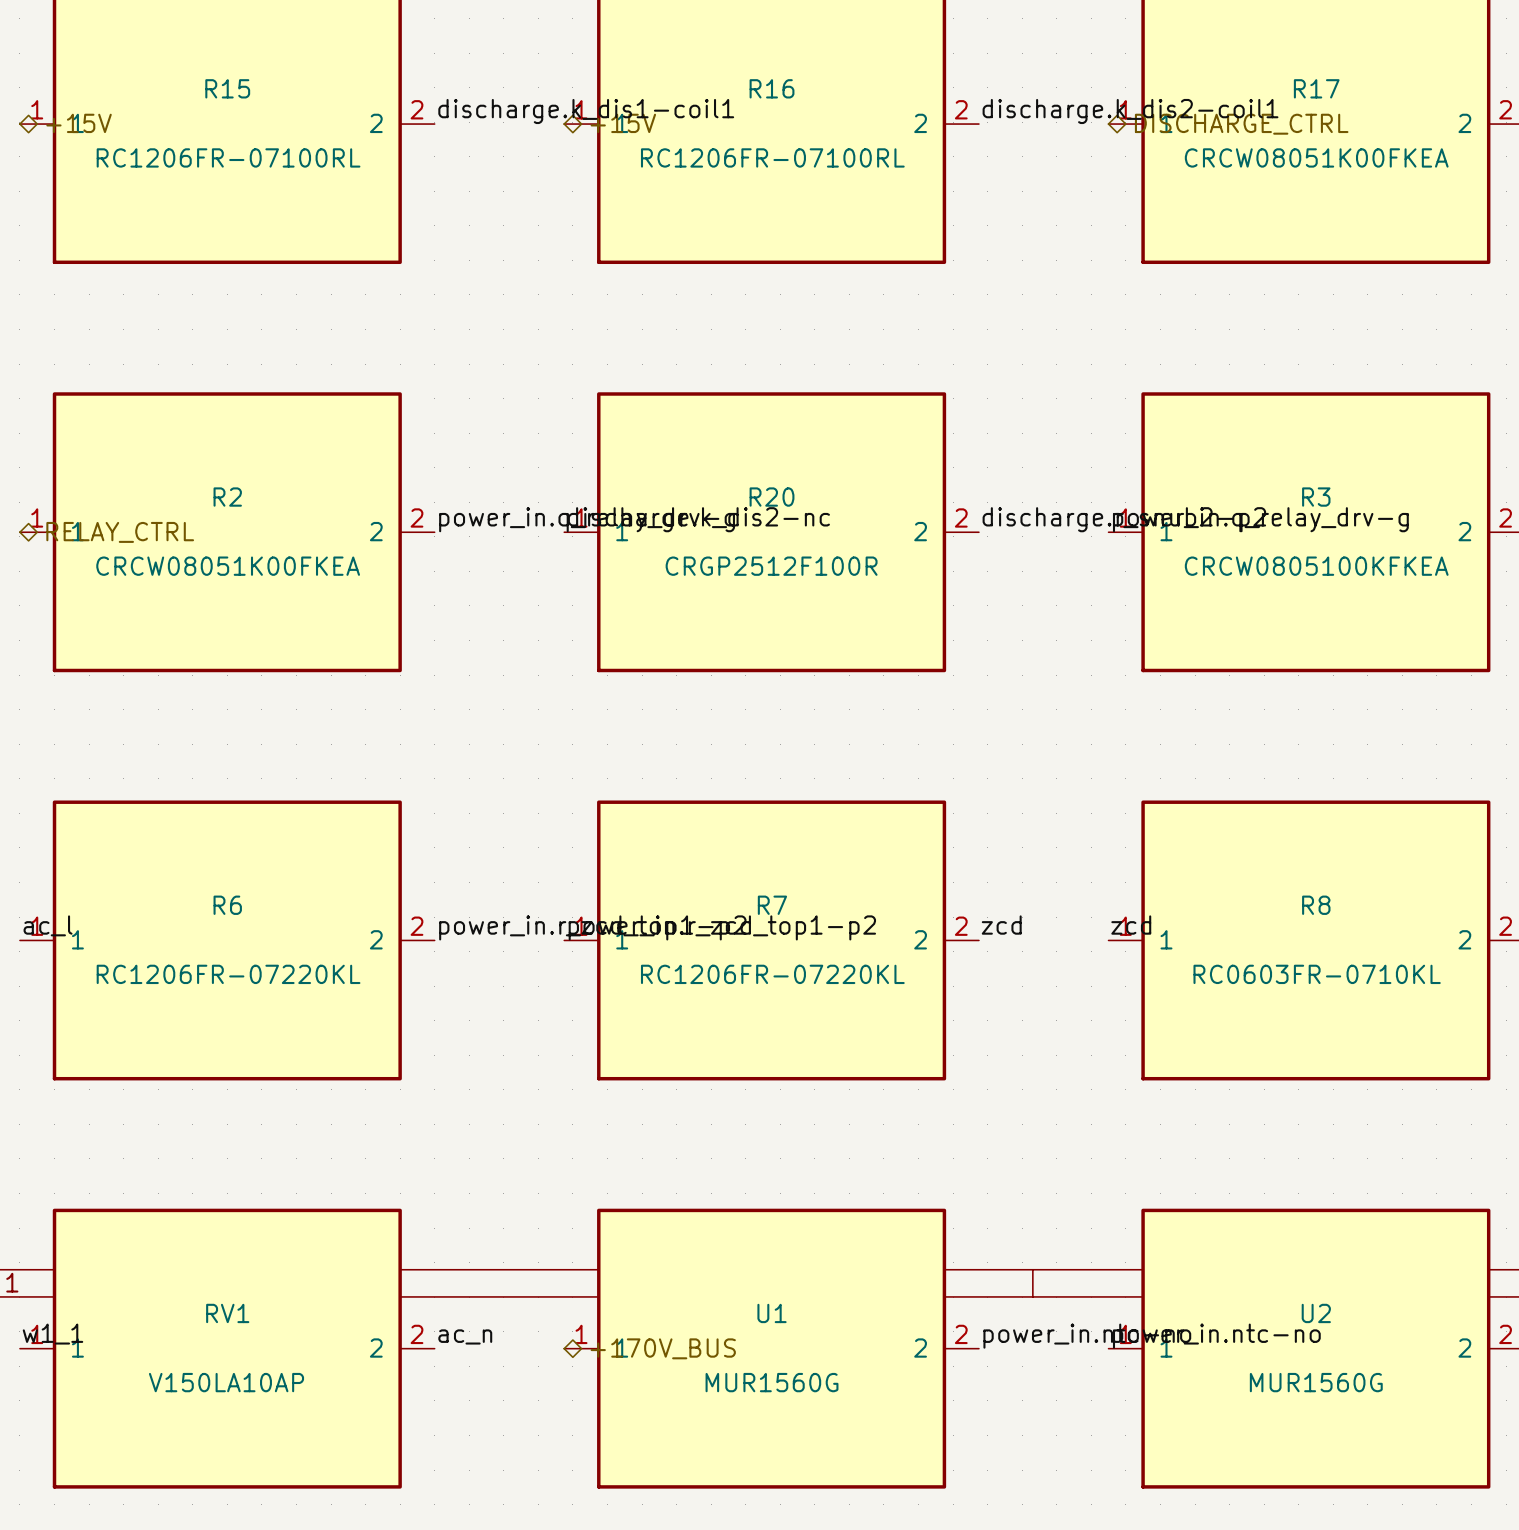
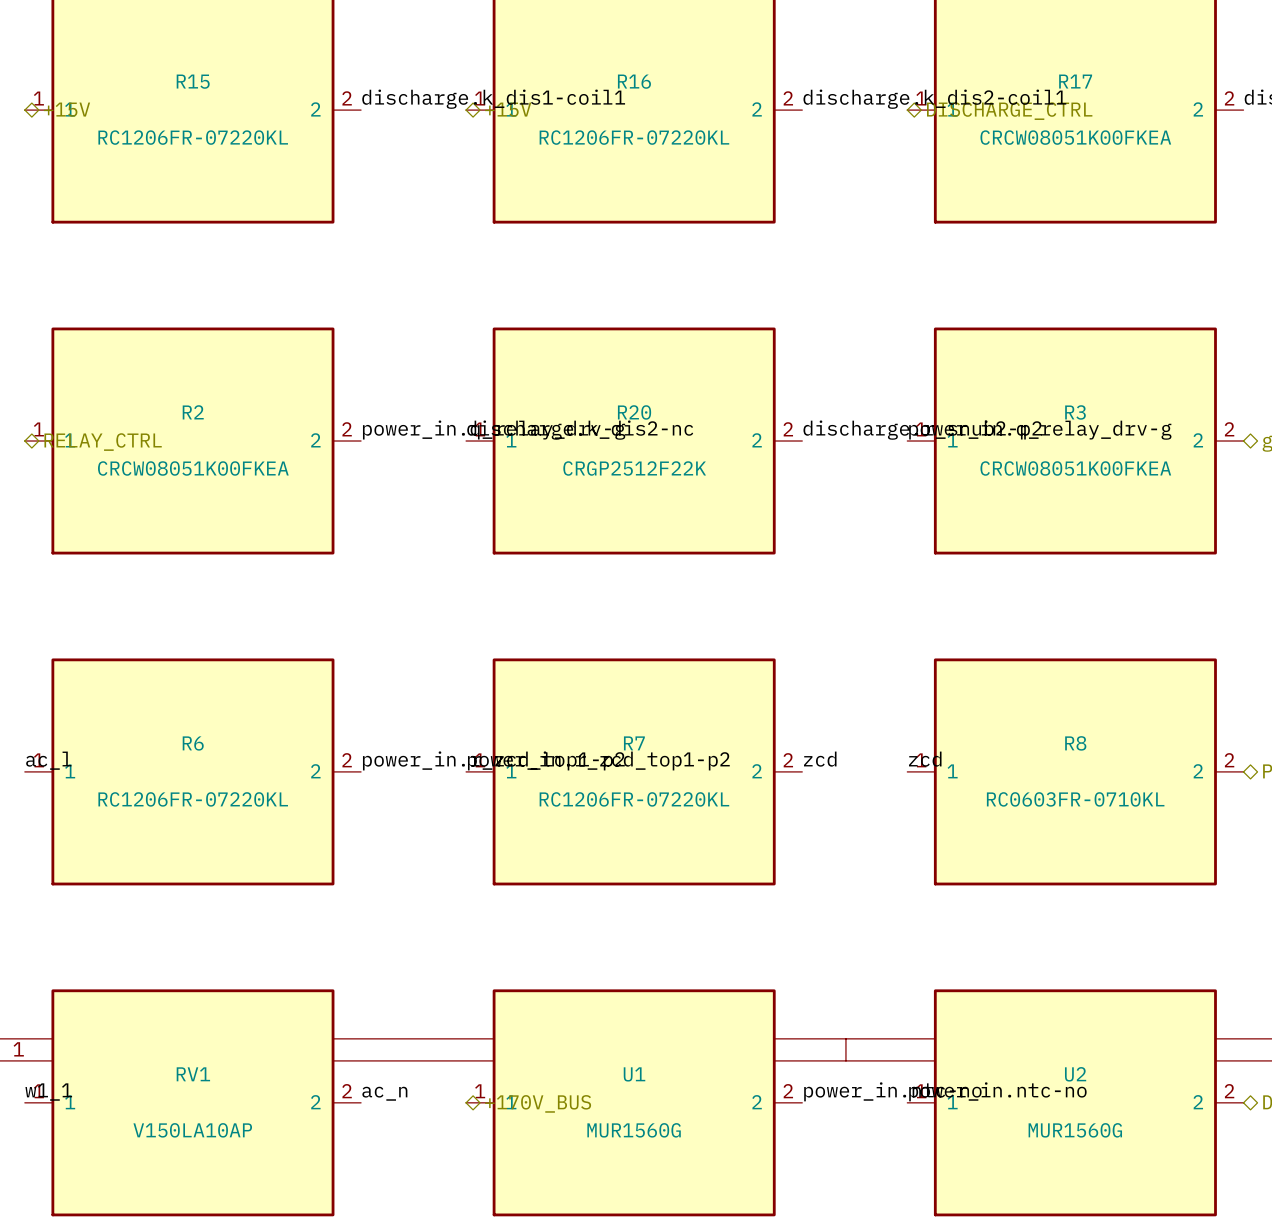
R15 value: RC1206FR-07100RL (228, 157) -> RC1206FR-07220KL (193, 137)
R16 value: RC1206FR-07100RL (772, 157) -> RC1206FR-07220KL (634, 137)
R20 value: CRGP2512F100R (771, 566) -> CRGP2512F22K (634, 468)
R3 value: CRCW0805100KFKEA (1316, 566) -> CRCW08051K00FKEA (1075, 468)

